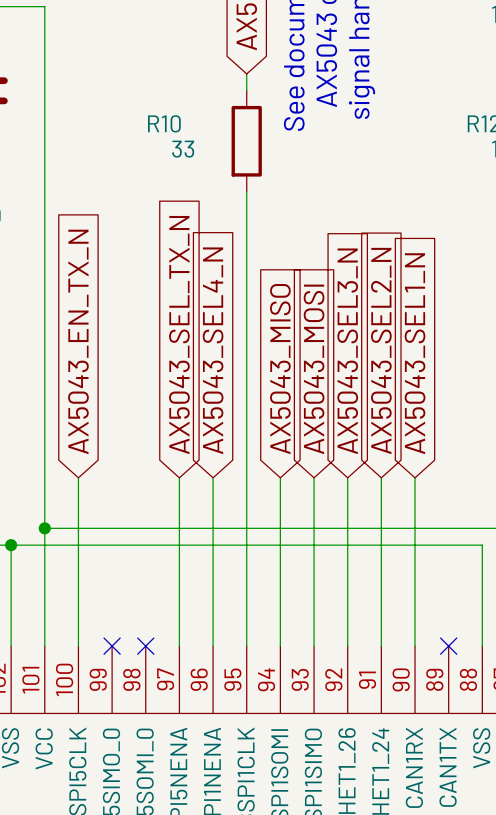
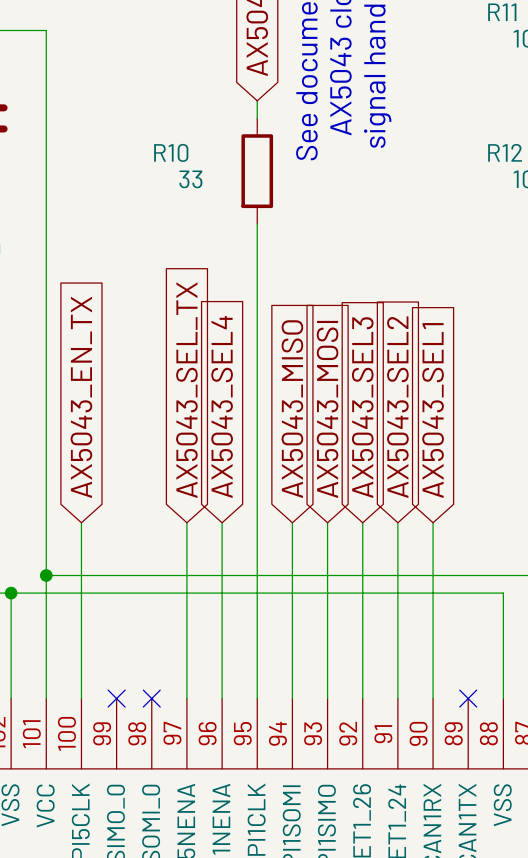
global label: AX5043_SEL_TX_N (179, 335) -> AX5043_SEL_TX (186, 390)
global label: AX5043_EN_TX_N (78, 341) -> AX5043_EN_TX (81, 397)
global label: AX5043_SEL4_N (213, 350) -> AX5043_SEL4 (222, 407)
global label: AX5043_SEL3_N (347, 351) -> AX5043_SEL3 (362, 407)
global label: AX5043_SEL2_N (381, 351) -> AX5043_SEL2 (397, 407)
global label: AX5043_SEL1_N (415, 353) -> AX5043_SEL1 (433, 410)

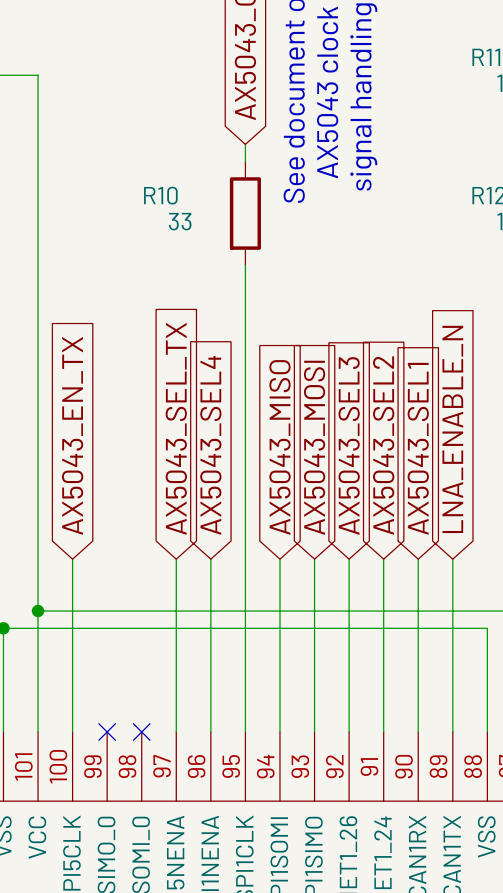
global label: none -> LNA_ENABLE_N (452, 429)
wire: none -> (452, 559) (452, 732)
no-connect mark: (468, 698) -> none

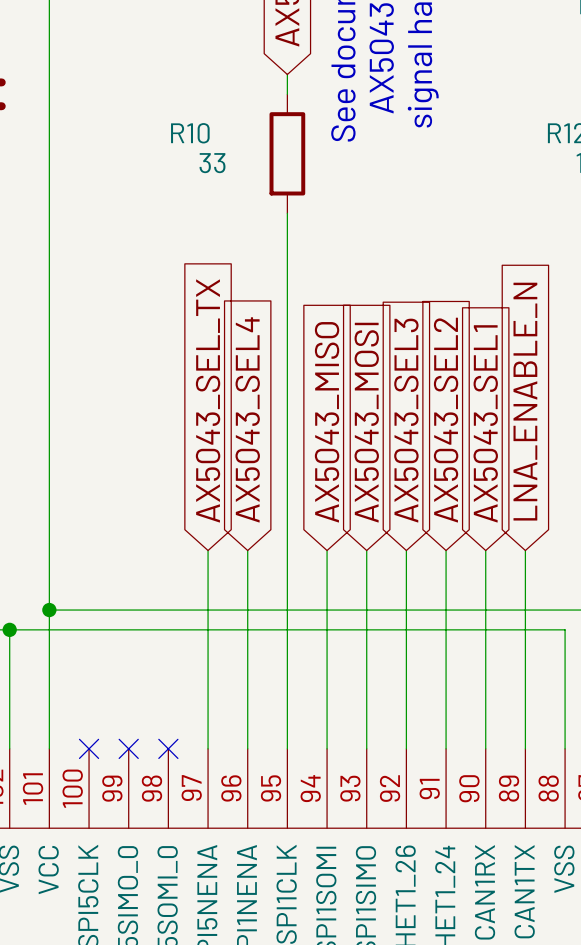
global label: AX5043_EN_TX (72, 435) -> none
wire: (72, 559) (72, 732) -> none
no-connect mark: none -> (89, 748)

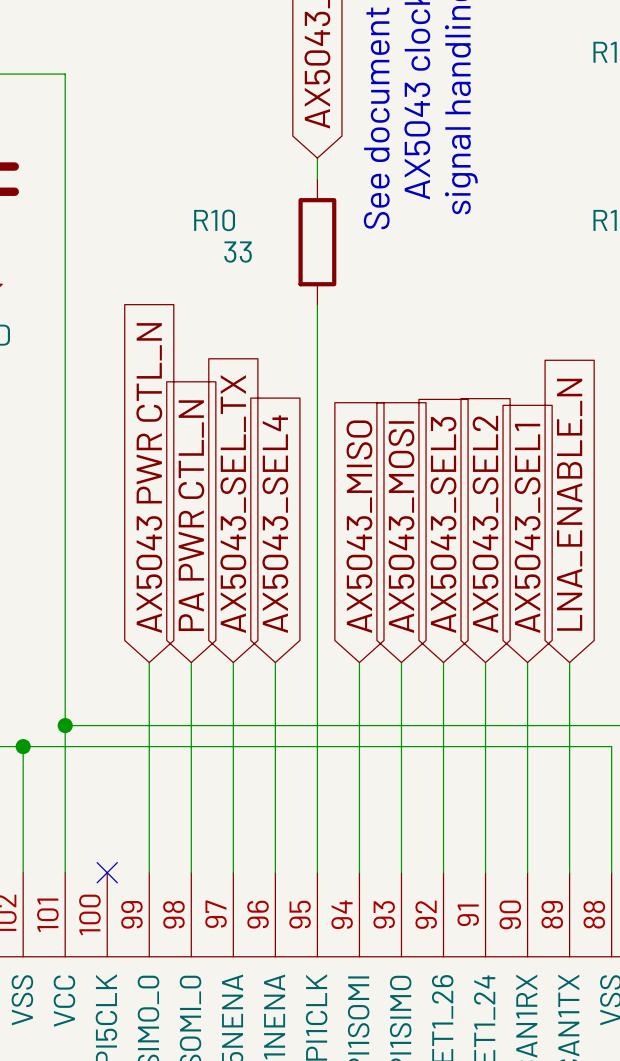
global label: none -> AX5043 PWR CTL_N (149, 478)
global label: none -> PA PWR CTL_N (191, 515)
wire: none -> (149, 662) (149, 872)
wire: none -> (191, 662) (191, 872)
no-connect mark: (128, 748) -> none
no-connect mark: (168, 748) -> none

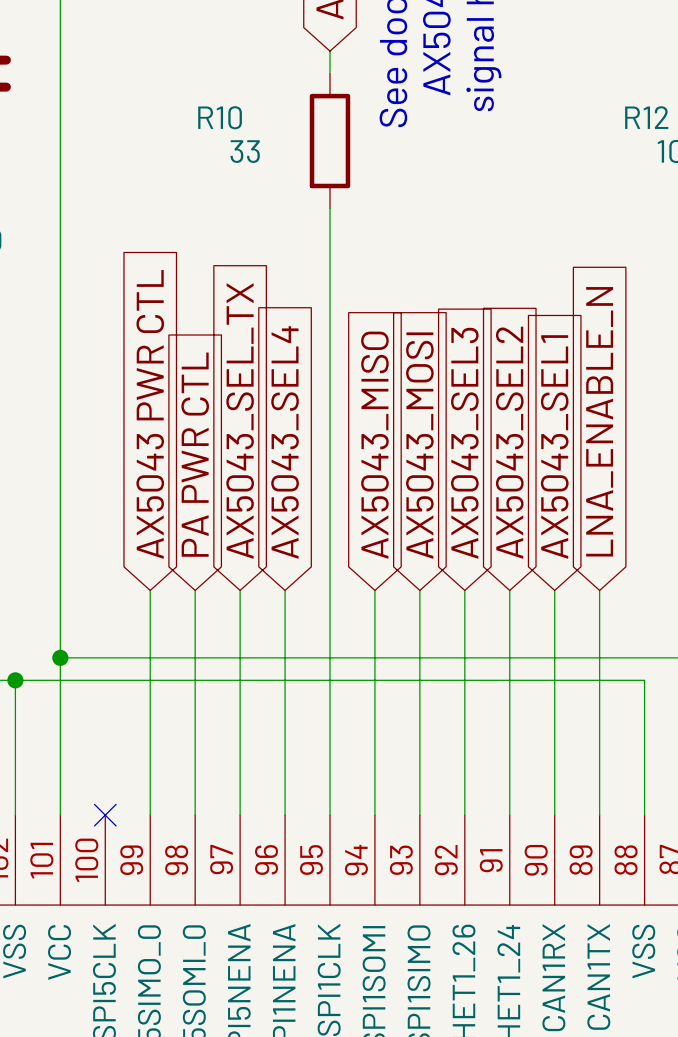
global label: AX5043 PWR CTL_N (149, 478) -> AX5043 PWR CTL (150, 414)
global label: PA PWR CTL_N (191, 515) -> PA PWR CTL (195, 454)

